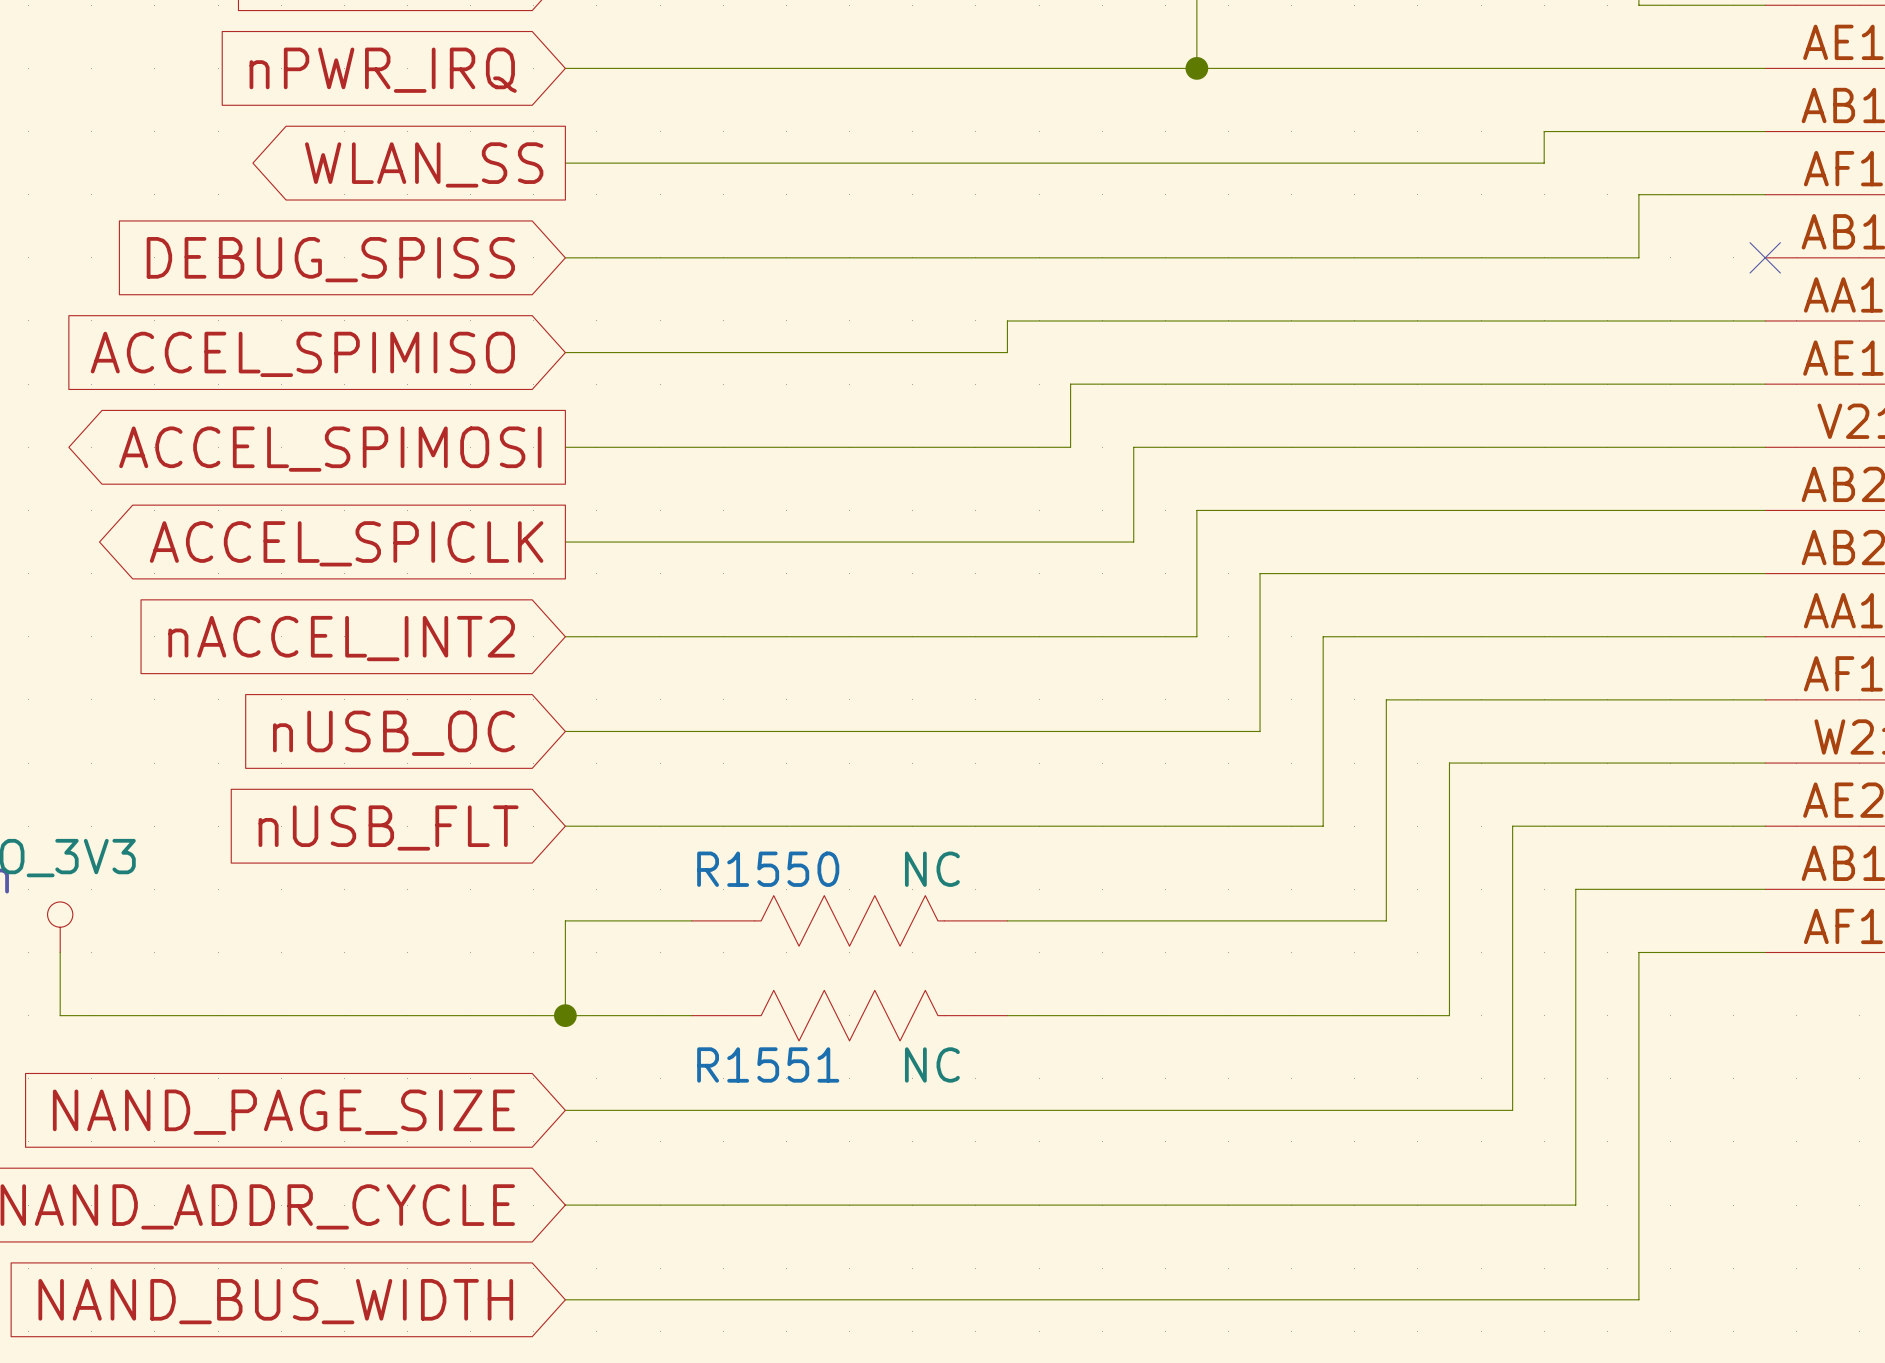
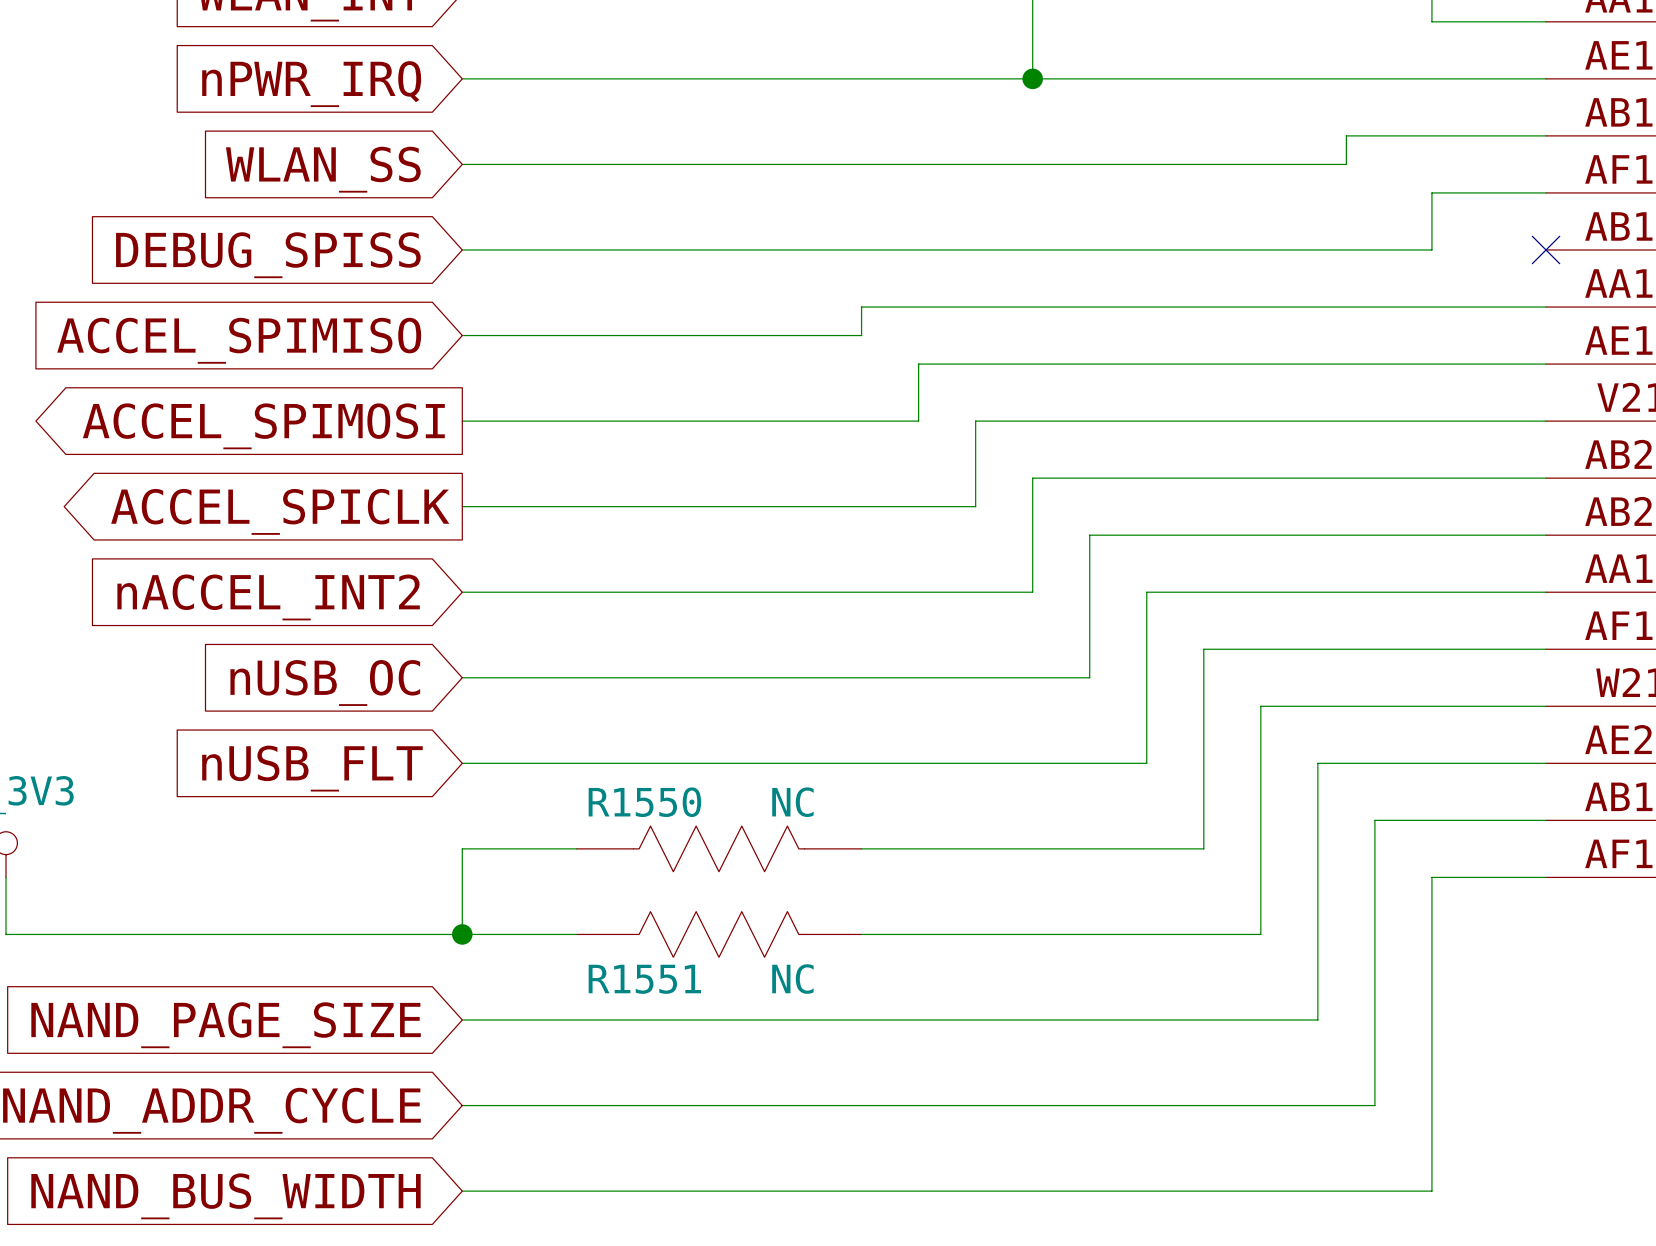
global label shape: output (424, 164) -> input (323, 169)

